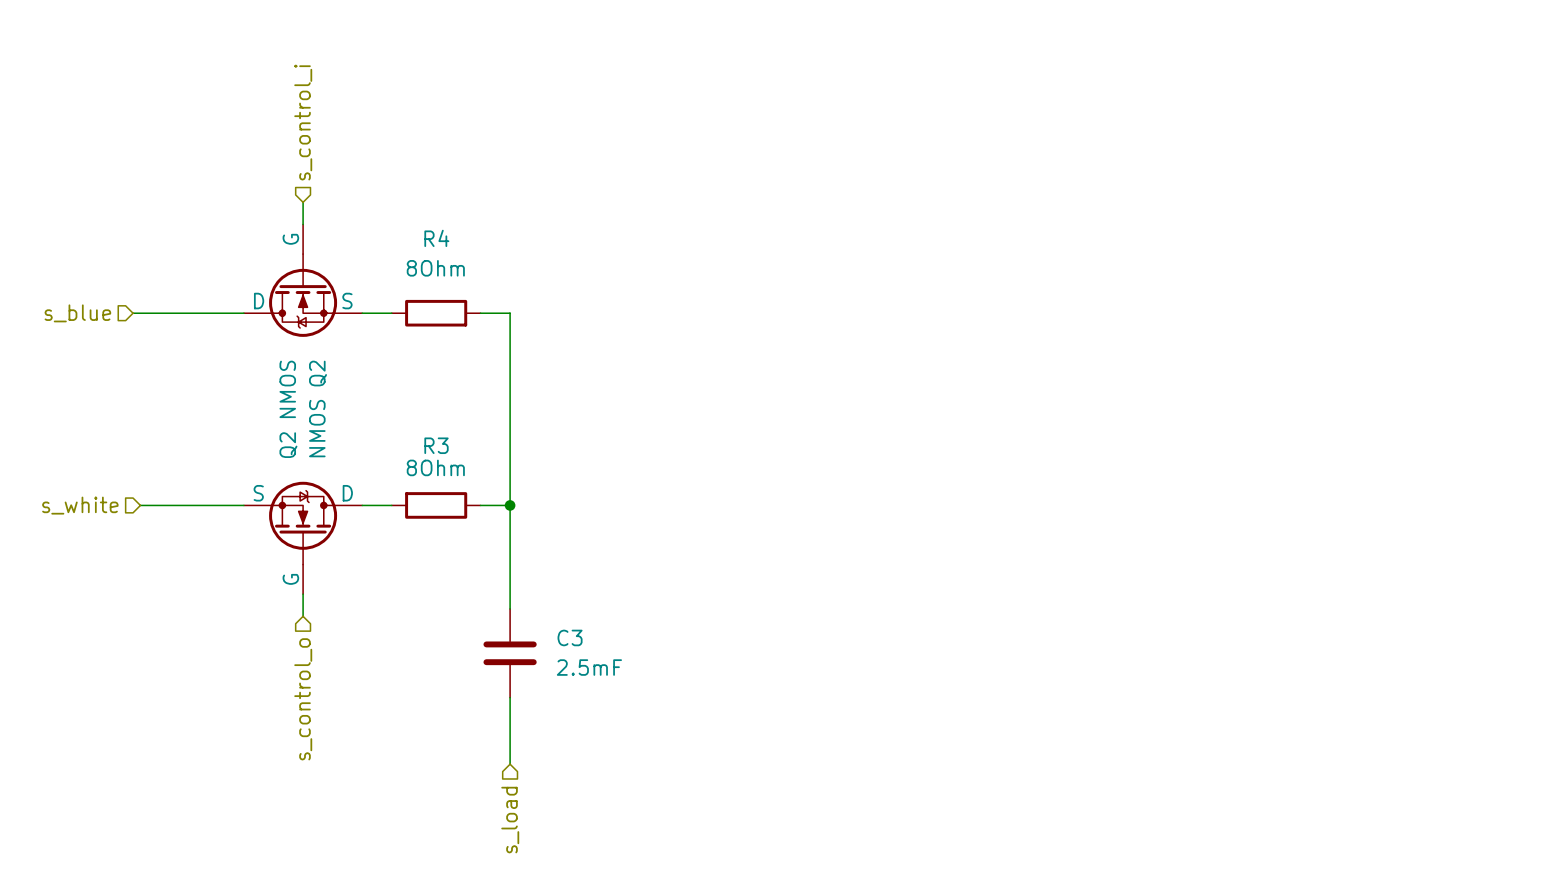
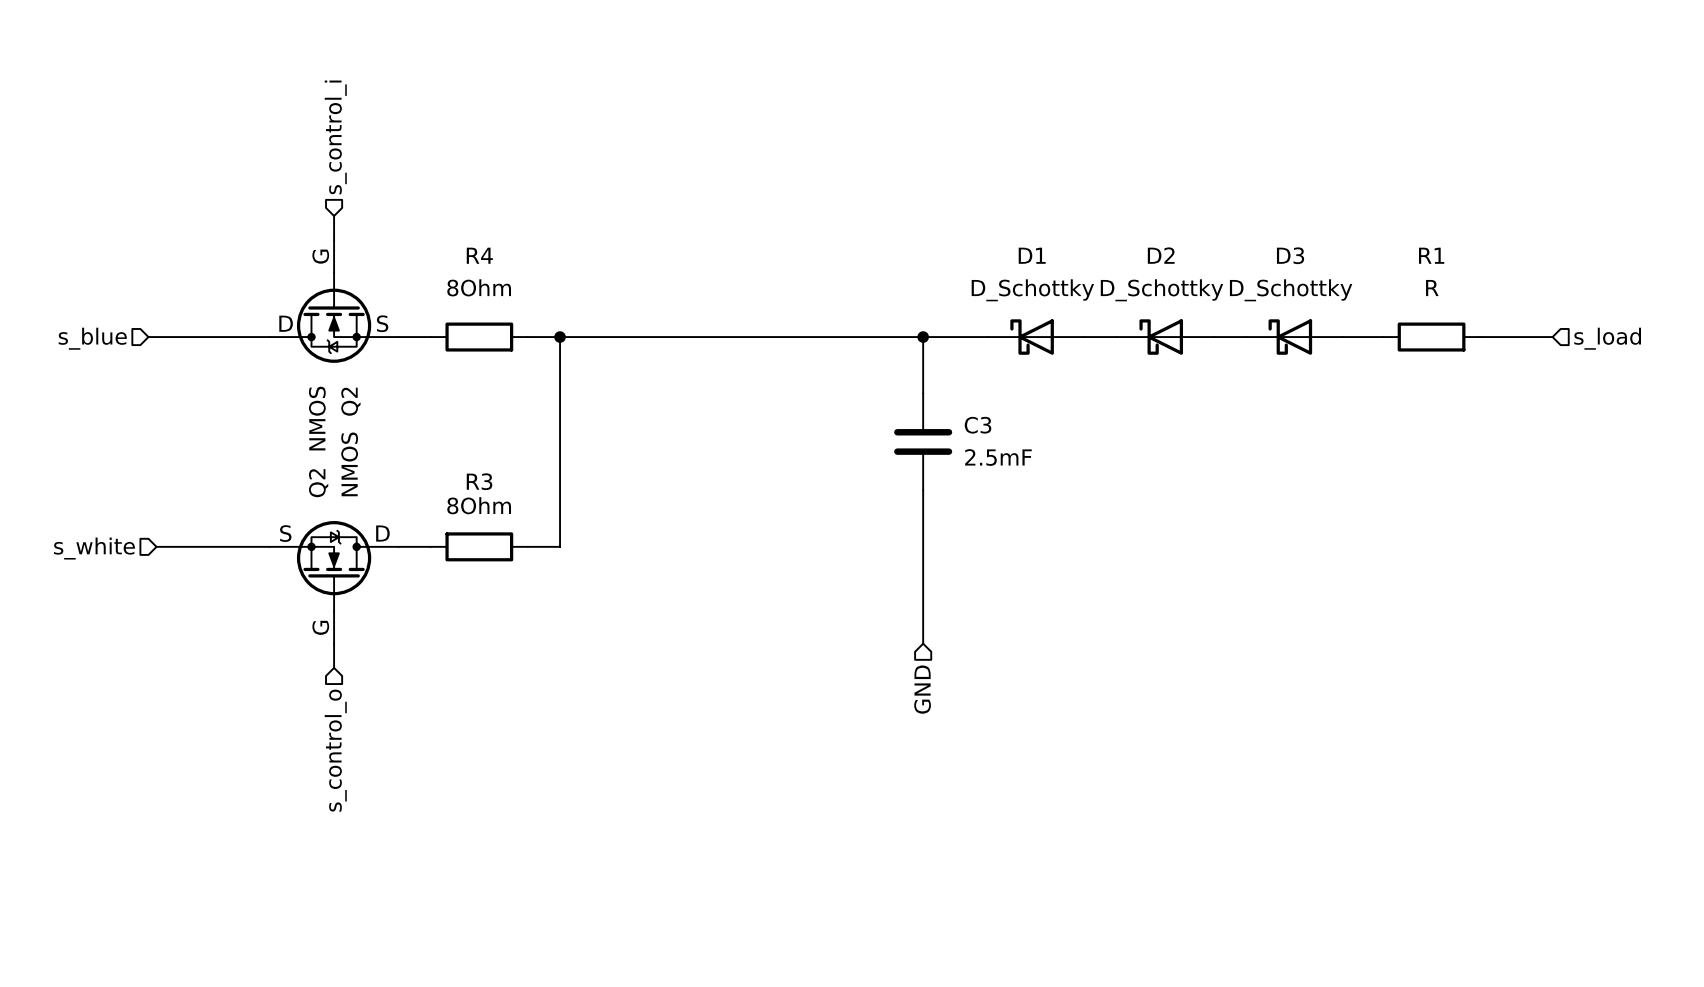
wire: none -> (560, 337) (987, 337)
junction: none -> (560, 337)
wire: none -> (923, 337) (923, 393)
junction: none -> (923, 337)
D1: none -> D_Schottky (1036, 337)
wire: none -> (1084, 337) (1116, 337)
D2: none -> D_Schottky (1165, 337)
wire: none -> (1213, 337) (1245, 337)
D3: none -> D_Schottky (1294, 337)
wire: none -> (1342, 337) (1383, 337)
R1: none -> R (1431, 337)
wire: none -> (1479, 337) (1552, 337)
hierarchical label: none -> s_load (1607, 338)
wire: none -> (923, 490) (923, 643)
wire: (510, 505) (510, 608) -> none
junction: (510, 505) -> none
hierarchical label: none -> GND (922, 689)
C3 name position: C3 (570, 637) -> C3 (978, 425)
C3 position: (510, 653) -> (923, 441)
C3 value position: 2.5mF (589, 667) -> 2.5mF (998, 457)
wire: (510, 697) (510, 764) -> none
hierarchical label: s_load (510, 820) -> none

